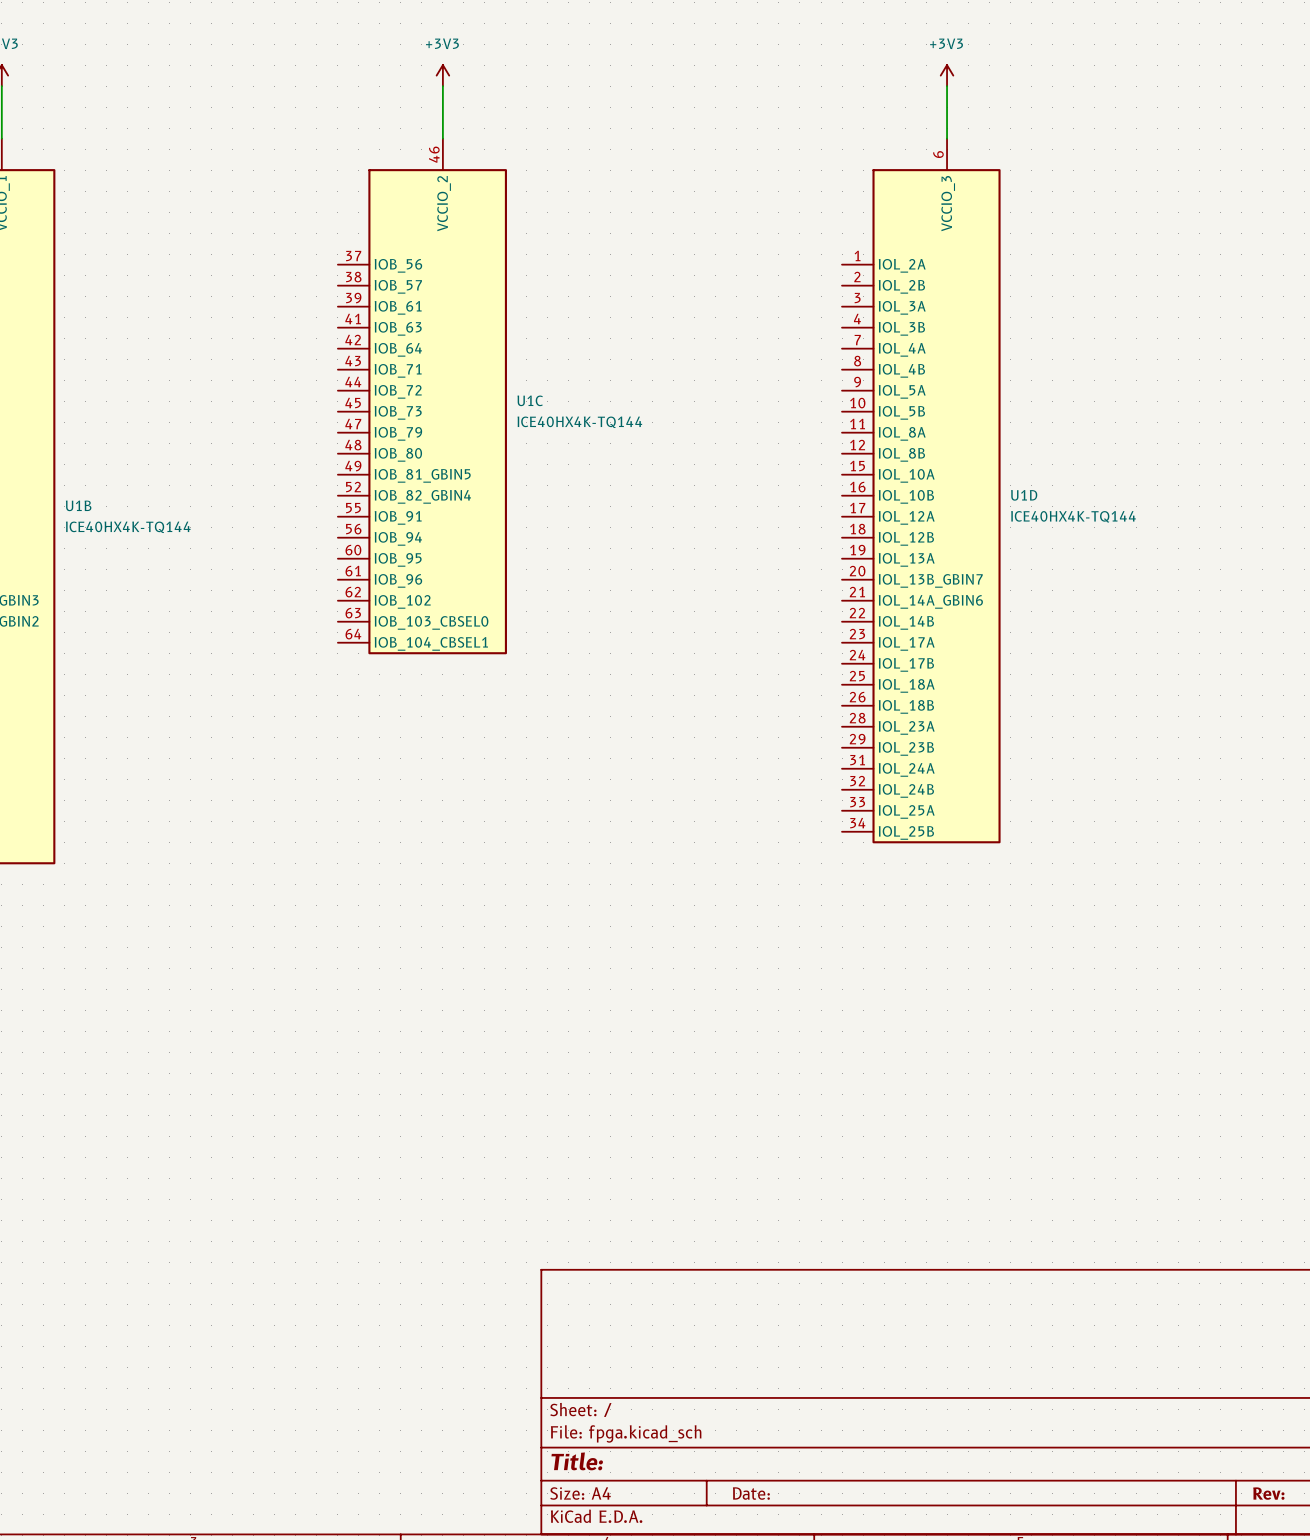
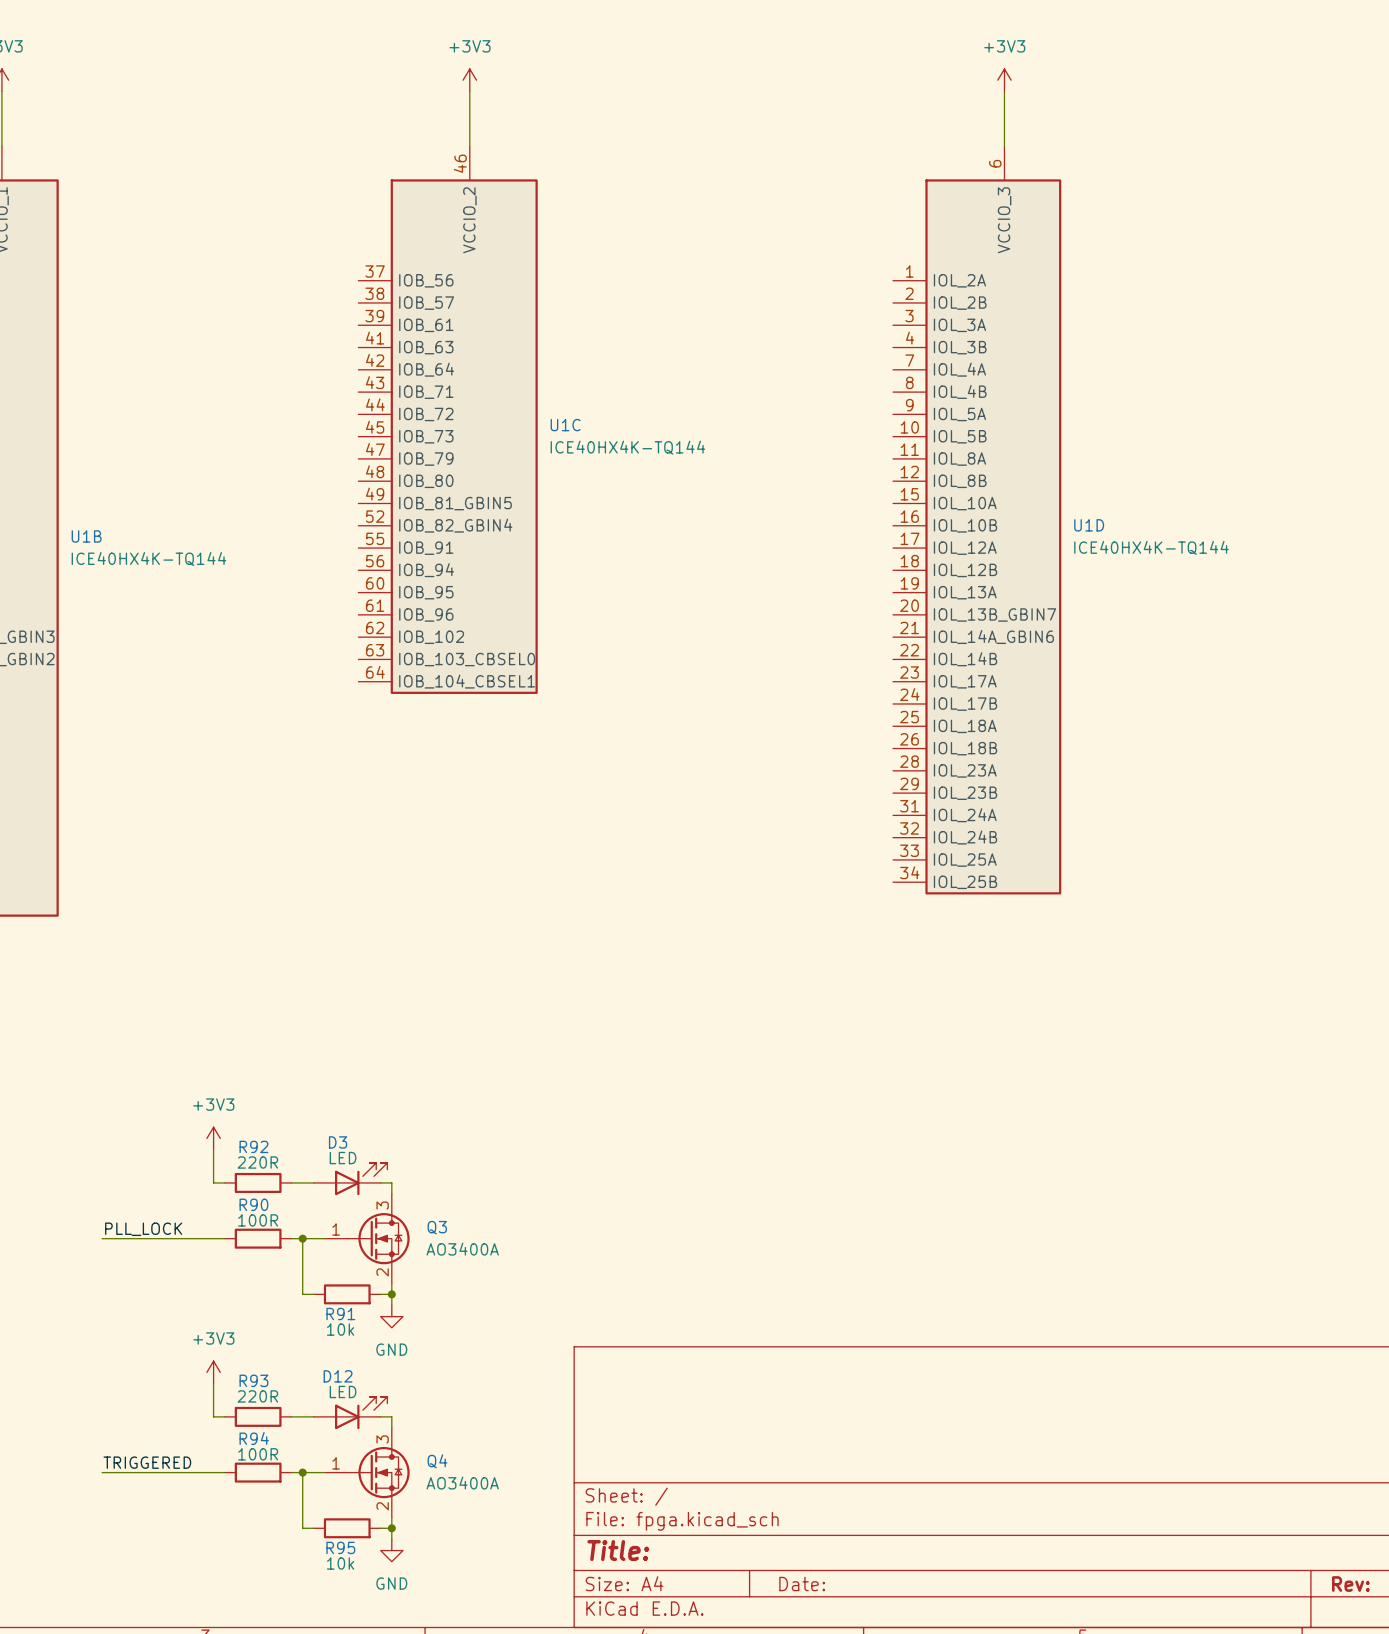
power symbol: none -> +3V3 (213, 1138)
wire: none -> (213, 1149) (213, 1182) (224, 1182)
D3: none -> LED (350, 1179)
R92: none -> 220R (258, 1182)
wire: none -> (291, 1182) (313, 1182)
wire: none -> (380, 1182) (391, 1182) (391, 1194)
label: none -> PLL_LOCK (143, 1229)
wire: none -> (102, 1238) (224, 1238)
R90: none -> 100R (258, 1238)
wire: none -> (291, 1238) (324, 1238)
wire: none -> (302, 1238) (302, 1294) (313, 1294)
junction: none -> (302, 1238)
Q3: none -> AO3400A (367, 1238)
wire: none -> (391, 1283) (391, 1305)
R91: none -> 10k (347, 1294)
wire: none -> (380, 1294) (391, 1294)
junction: none -> (391, 1294)
power symbol: none -> GND (391, 1316)
power symbol: none -> +3V3 (213, 1372)
wire: none -> (213, 1383) (213, 1416) (224, 1416)
D12: none -> LED (350, 1413)
R93: none -> 220R (258, 1416)
wire: none -> (291, 1416) (313, 1416)
wire: none -> (380, 1416) (391, 1416) (391, 1428)
label: none -> TRIGGERED (147, 1462)
wire: none -> (102, 1472) (224, 1472)
R94: none -> 100R (258, 1472)
wire: none -> (291, 1472) (324, 1472)
wire: none -> (302, 1472) (302, 1528) (313, 1528)
junction: none -> (302, 1472)
Q4: none -> AO3400A (367, 1472)
wire: none -> (391, 1517) (391, 1539)
R95: none -> 10k (347, 1528)
wire: none -> (380, 1528) (391, 1528)
junction: none -> (391, 1528)
power symbol: none -> GND (391, 1550)

